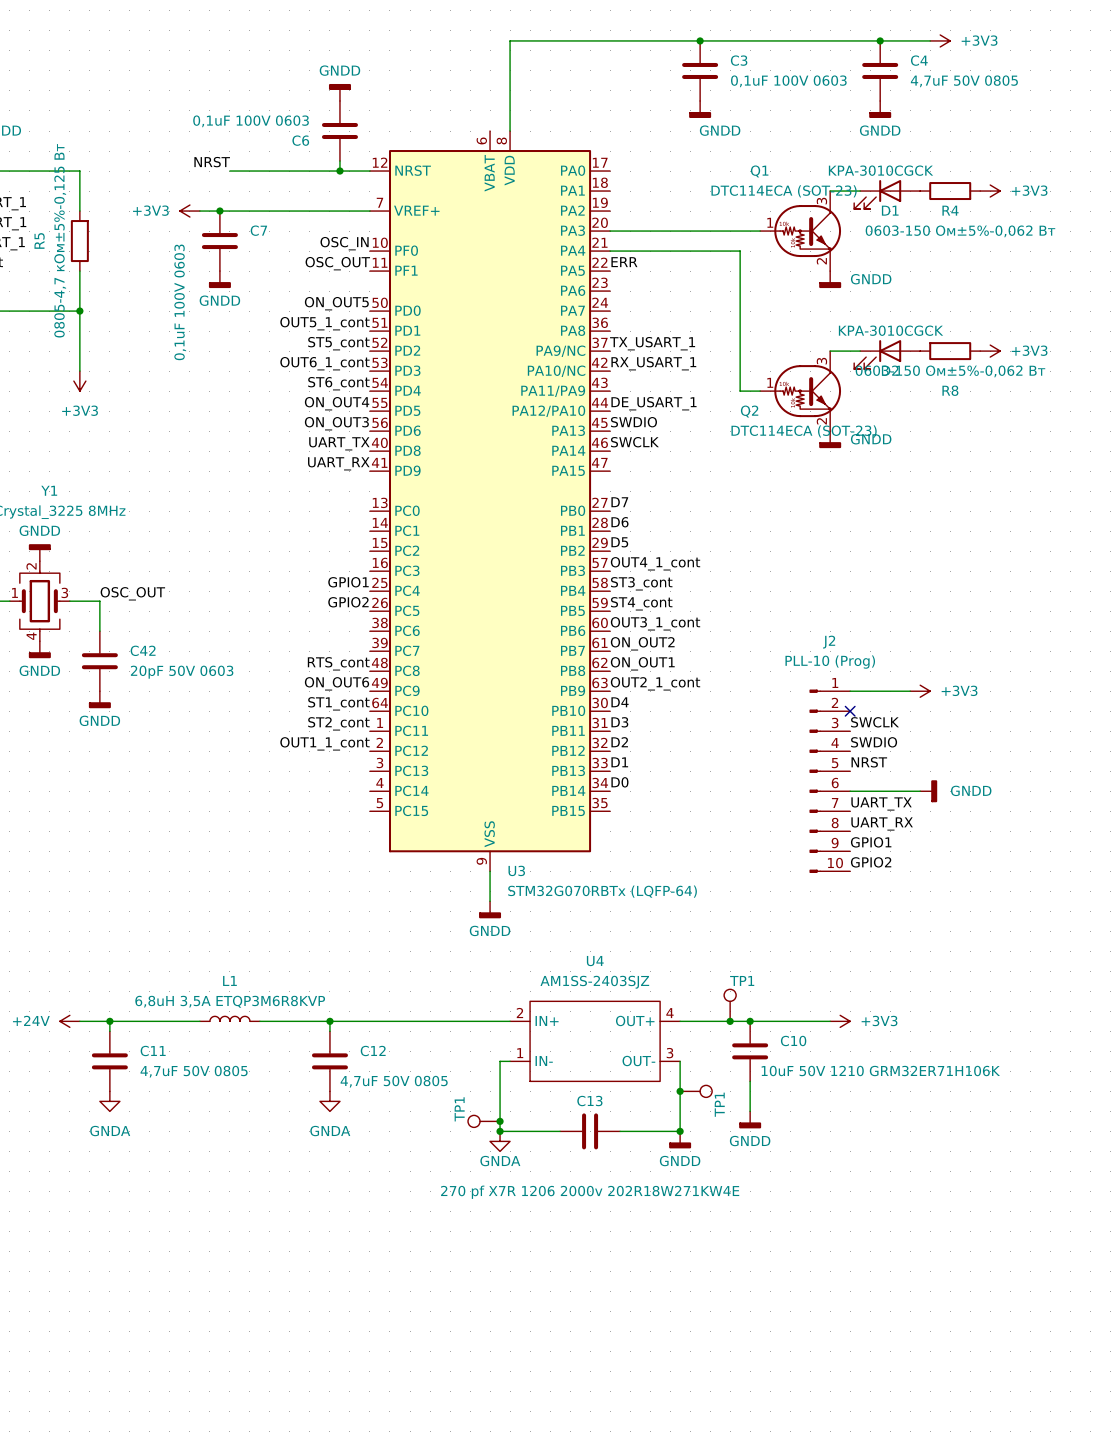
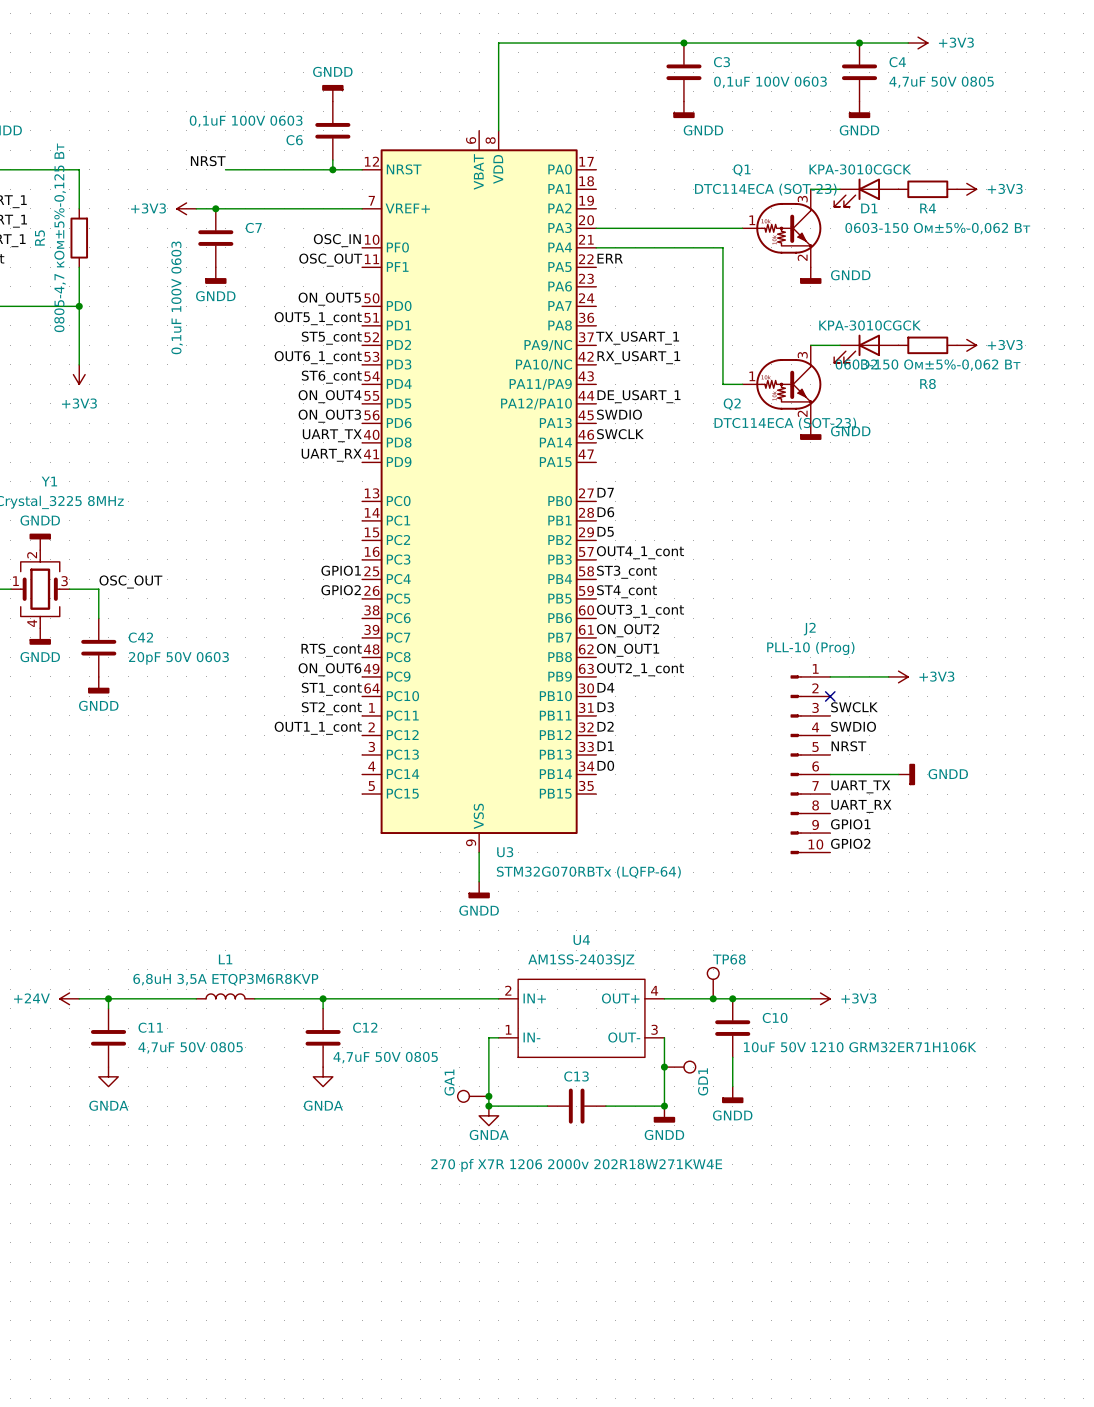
TP1 name: TP1 (742, 980) -> TP68 (729, 959)
TP1 name: TP1 (719, 1104) -> GD1 (703, 1081)
TP1 name: TP1 (459, 1109) -> GA1 (449, 1082)

